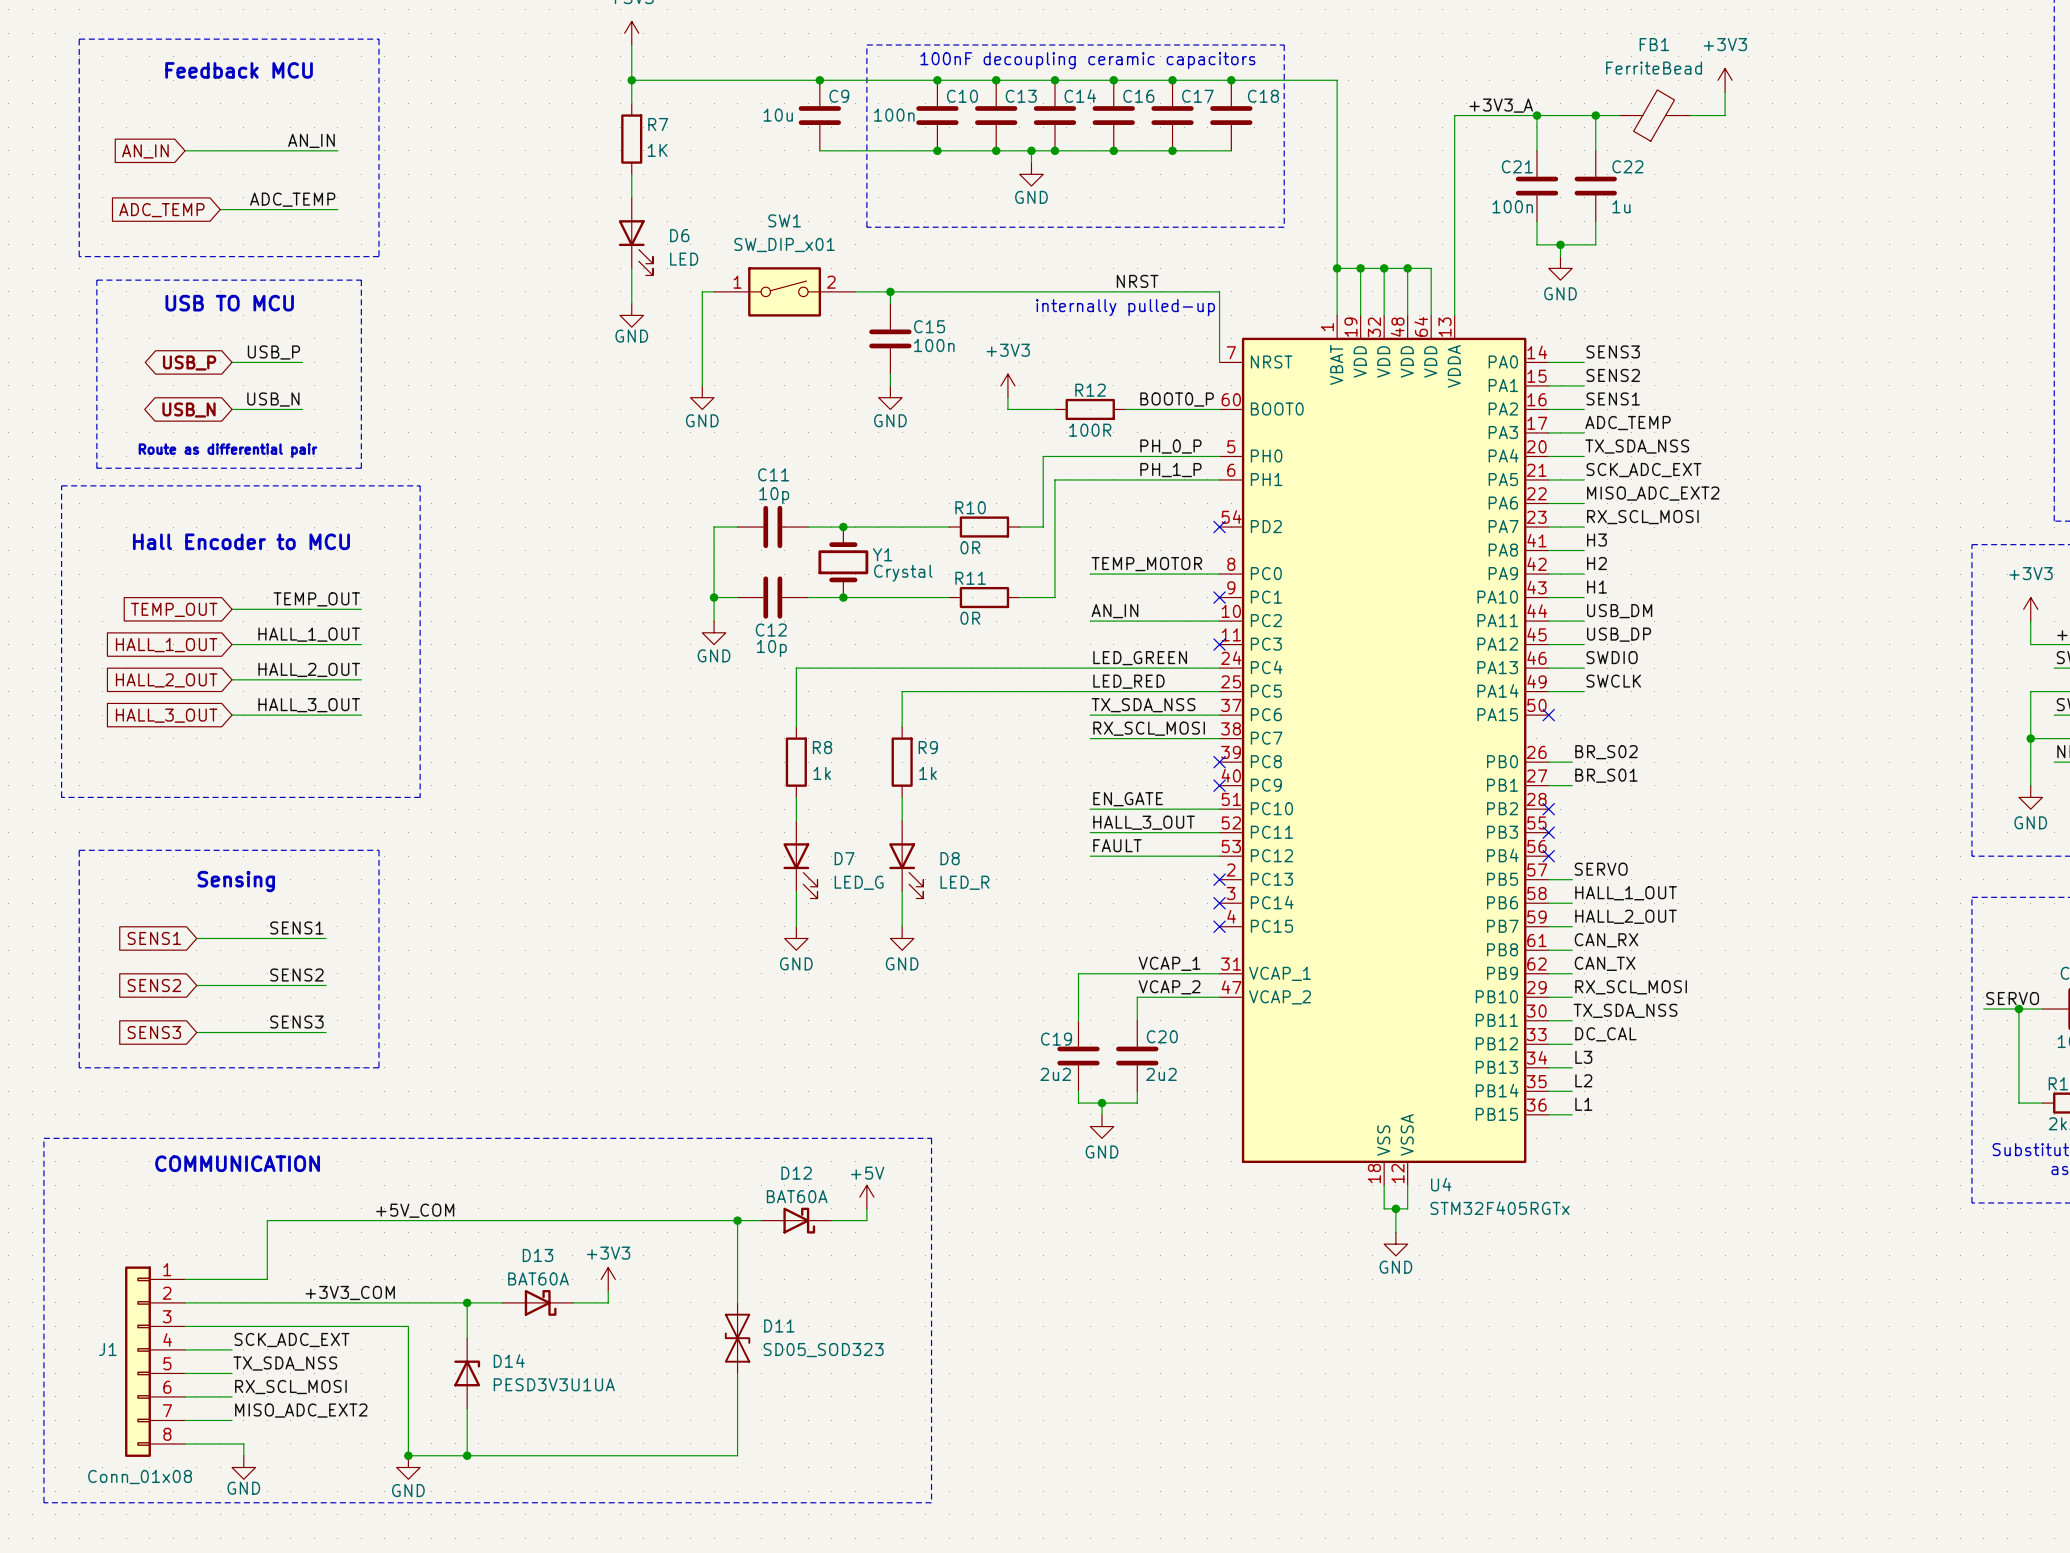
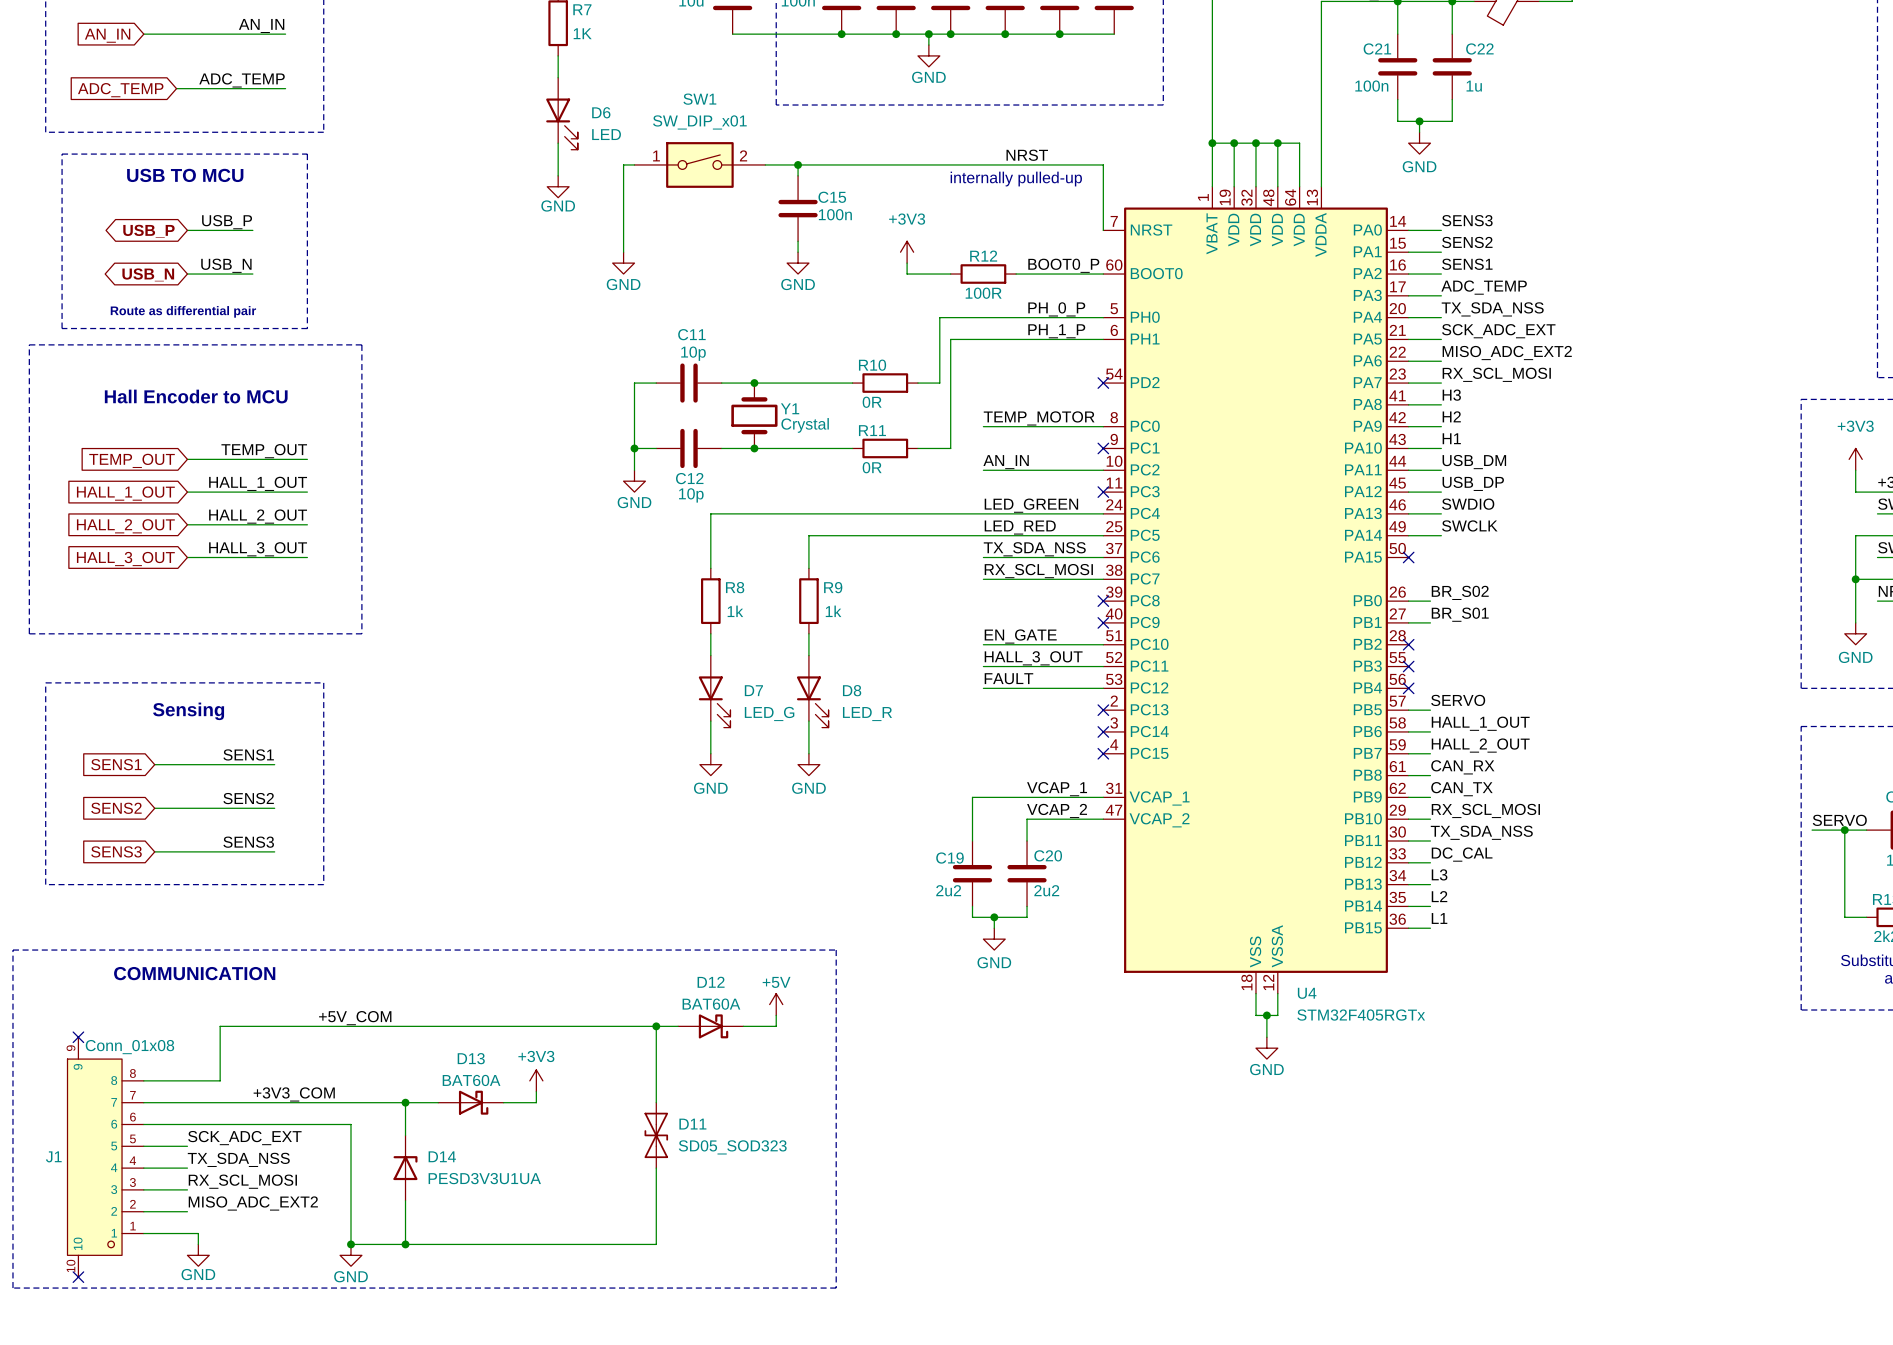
no-connect mark: none -> (78, 1037)
J1 symbol: [125, 1266, 186, 1457] -> [67, 1037, 144, 1278]
J1 value position: Conn_01x08 (140, 1477) -> Conn_01x08 (129, 1047)
no-connect mark: none -> (78, 1277)

